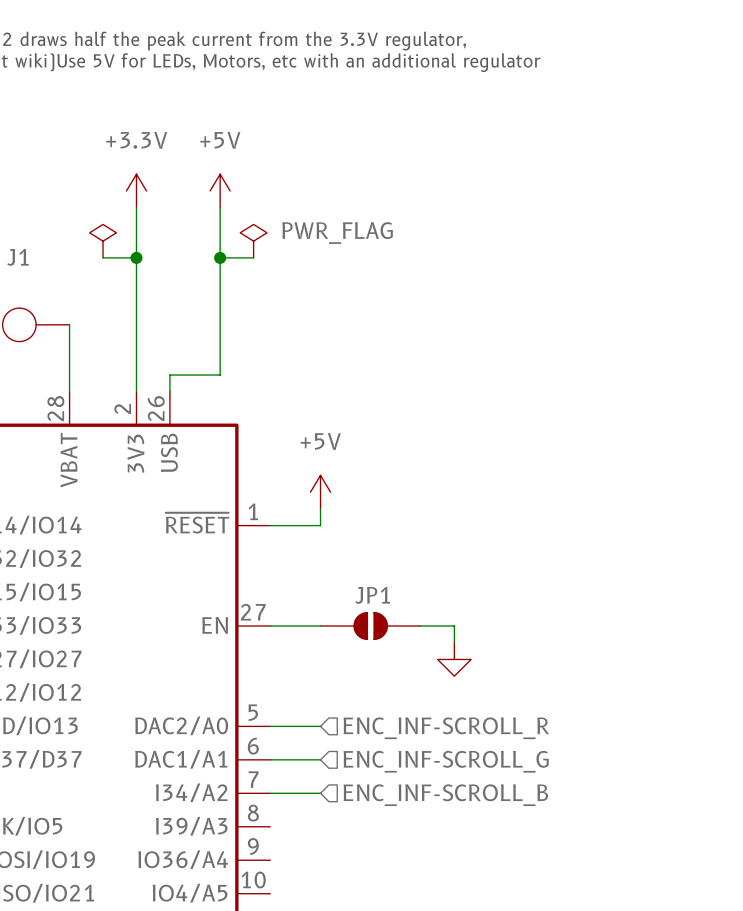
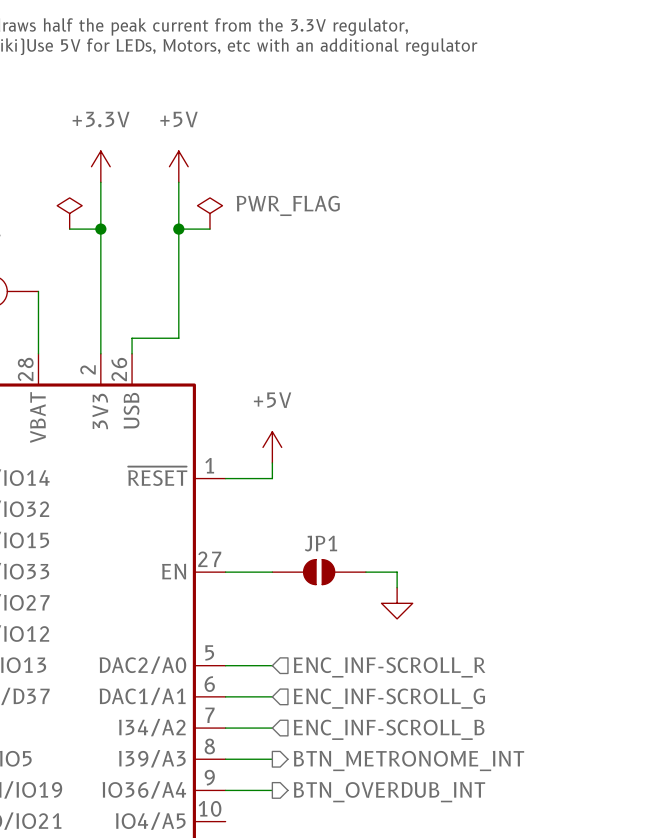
wire: none -> (225, 759) (272, 759)
hierarchical label: none -> BTN_METRONOME_INT (408, 760)
wire: none -> (225, 790) (272, 790)
hierarchical label: none -> BTN_OVERDUB_INT (389, 792)

